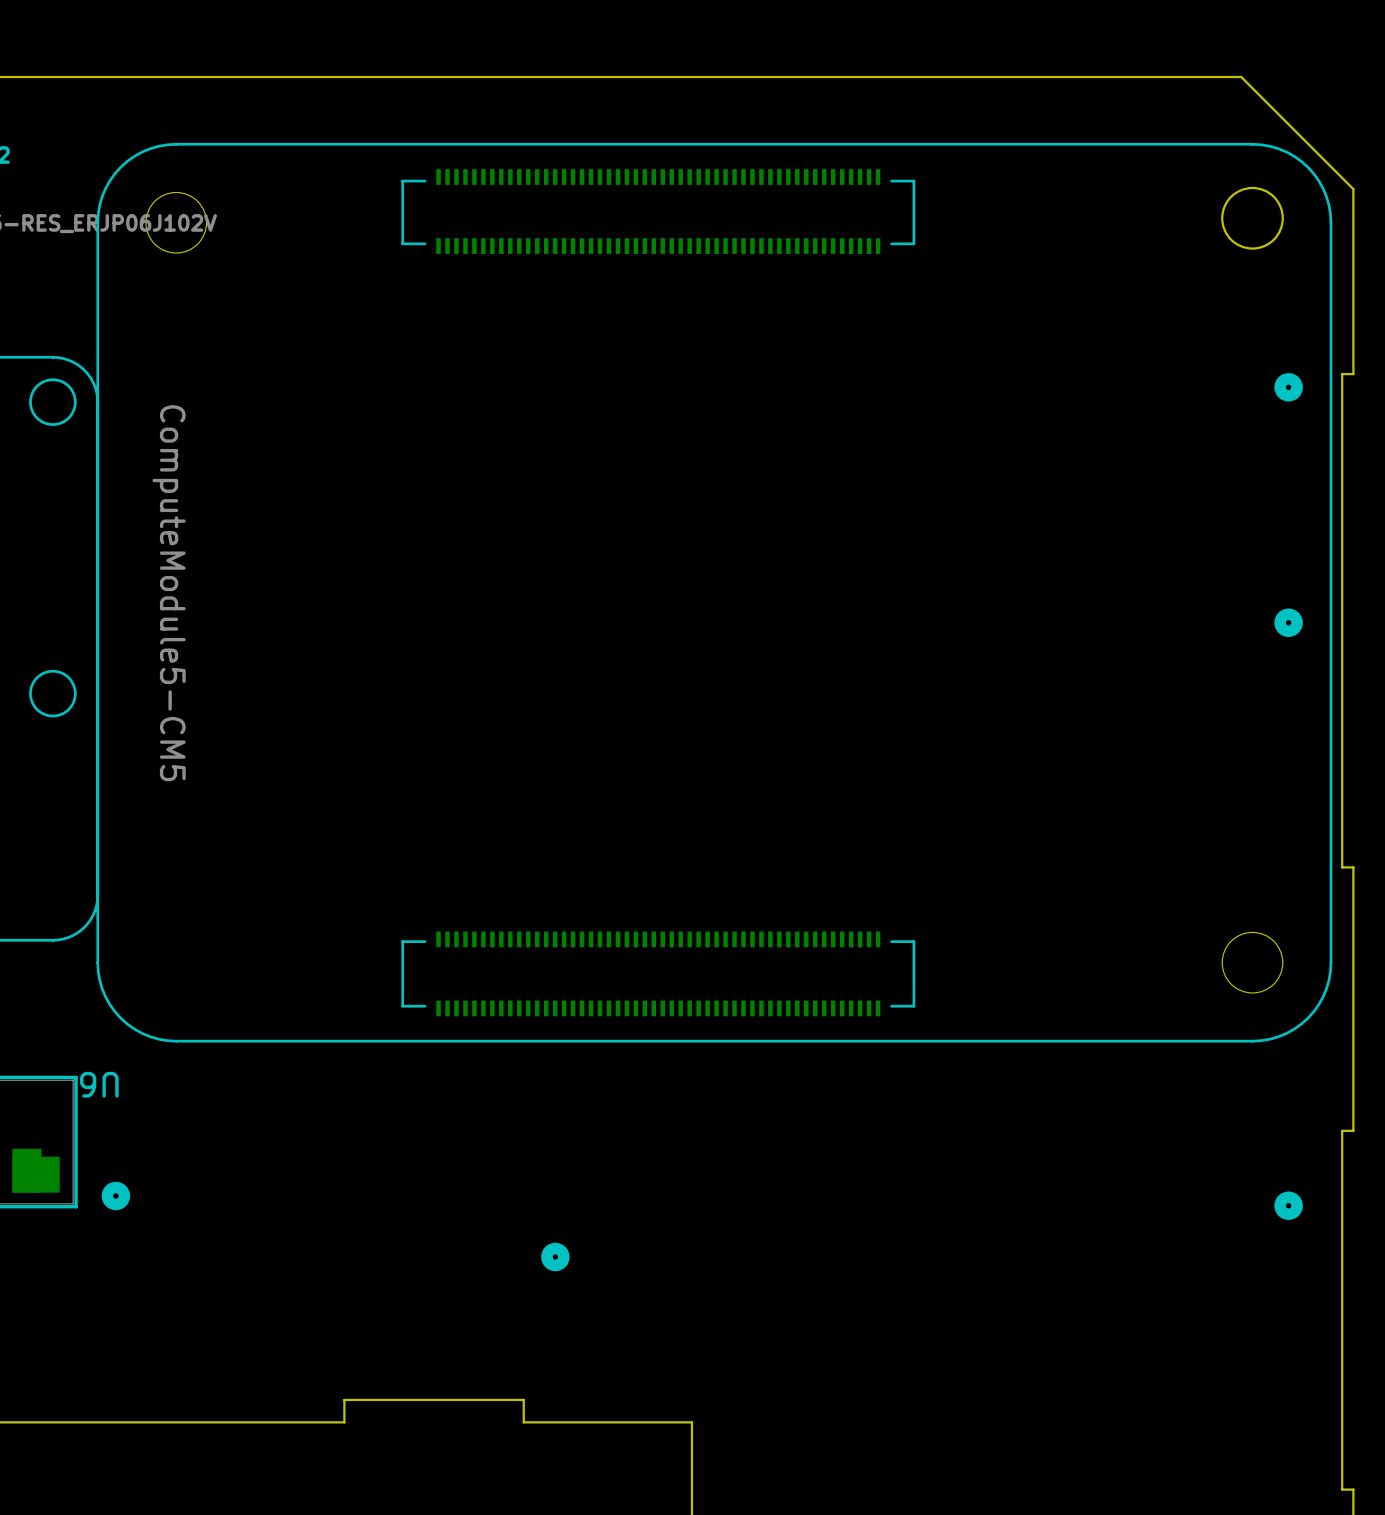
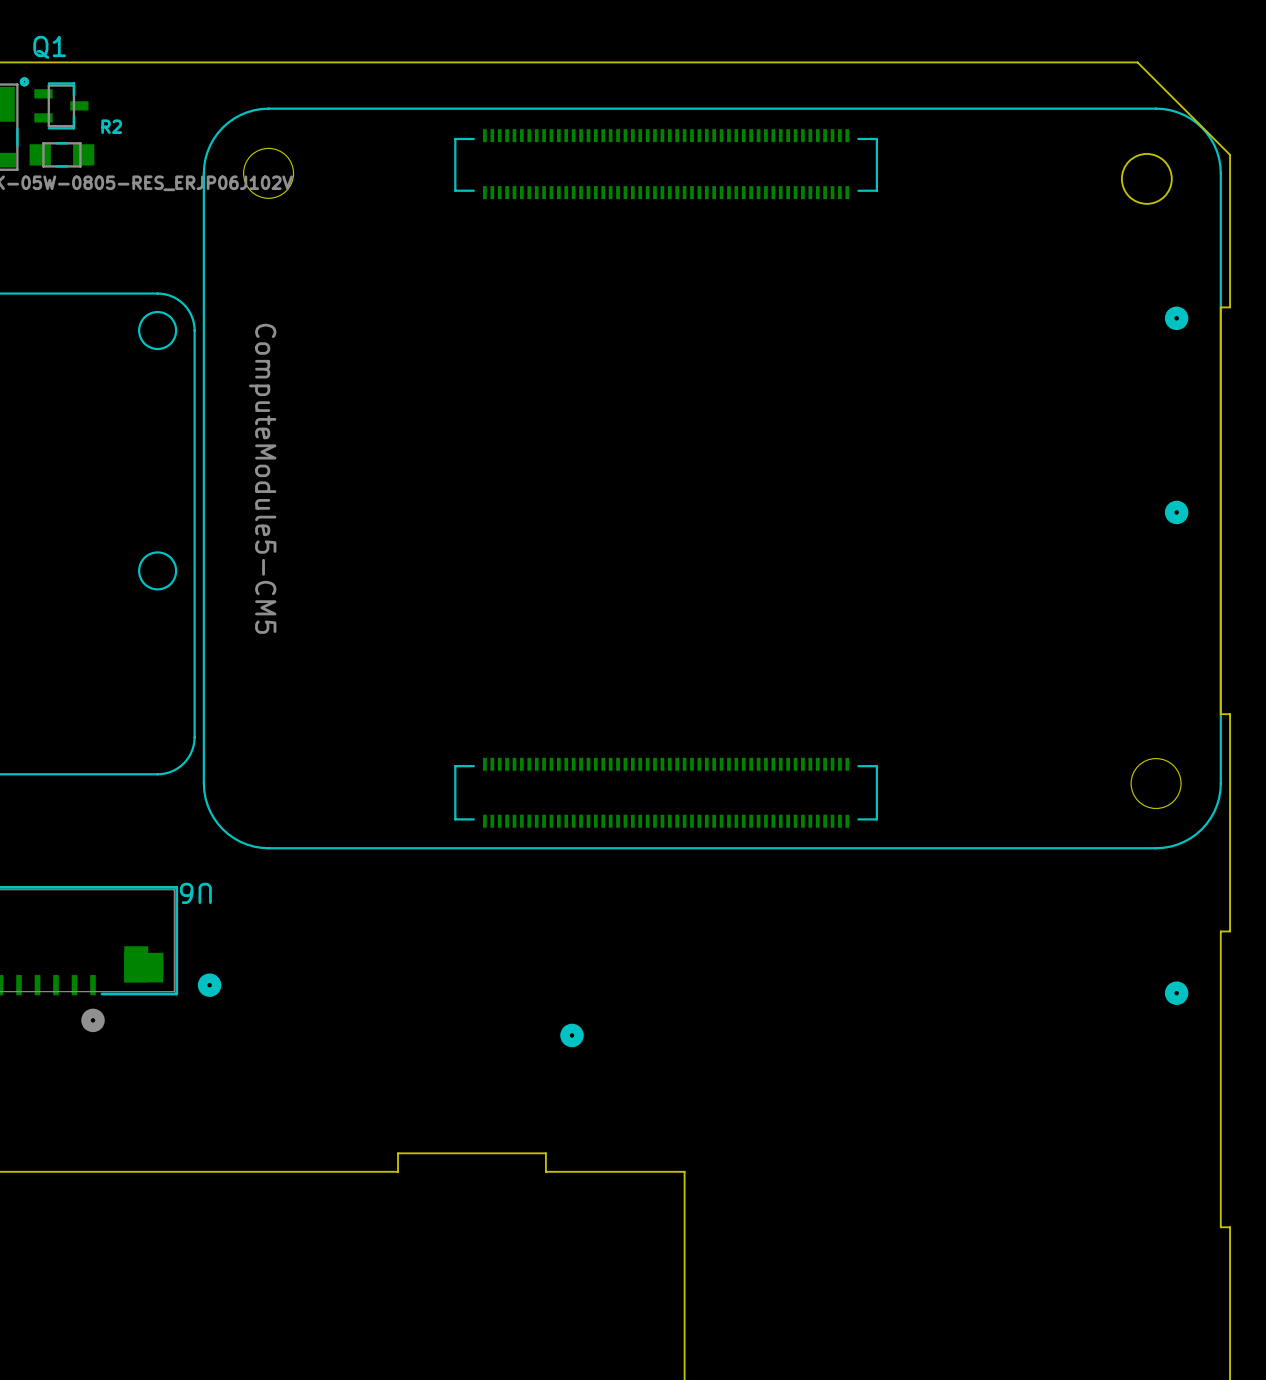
part position: (714, 592) -> (712, 478)

